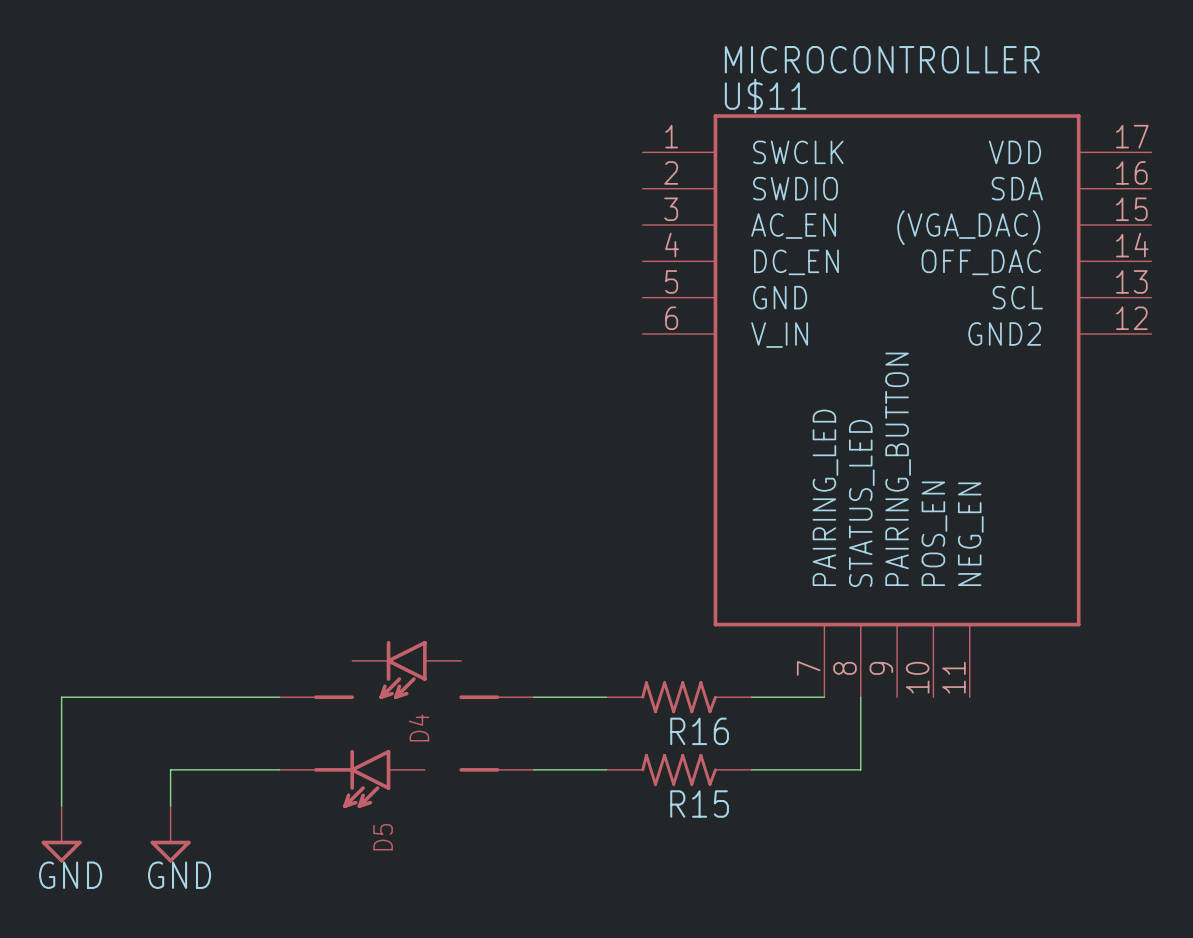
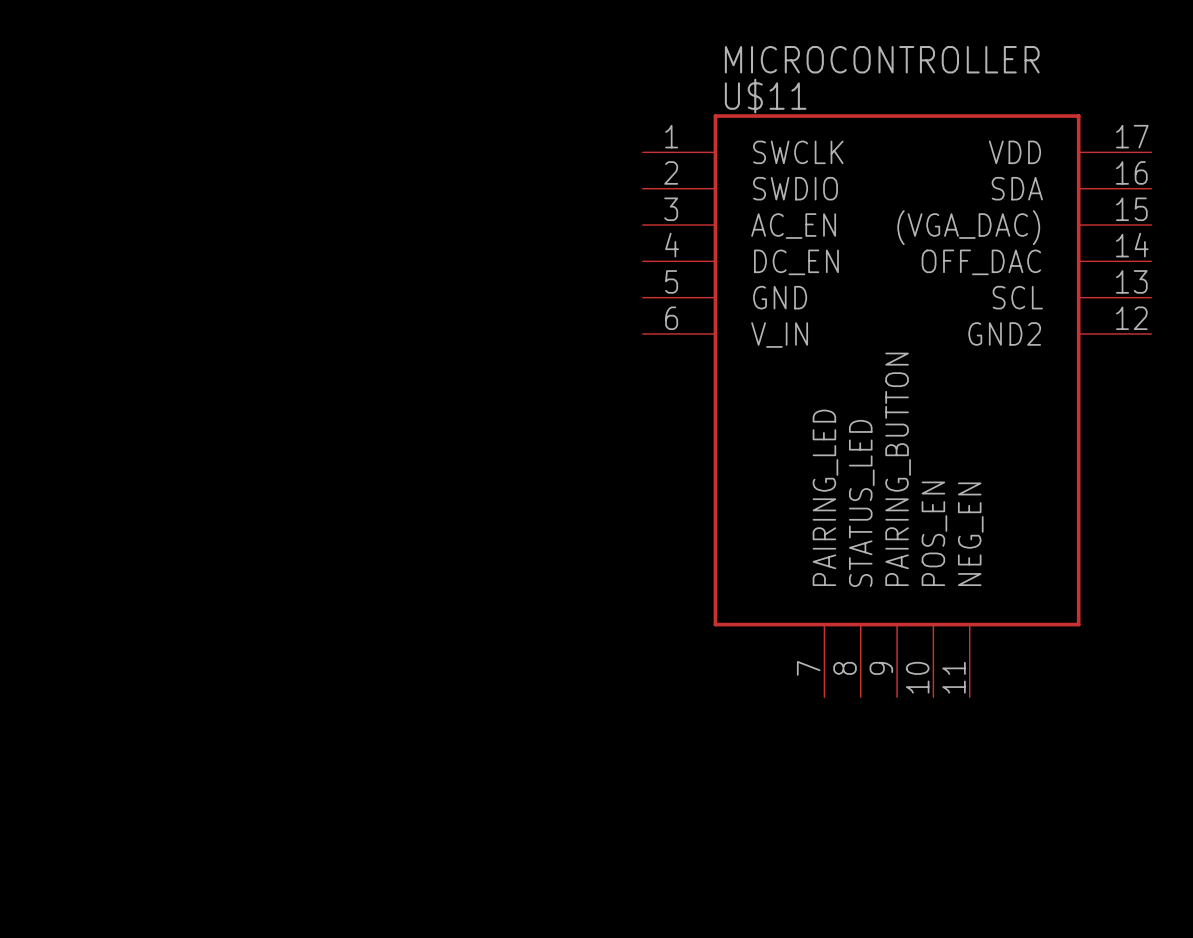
D4: (406, 669) -> none
wire: (279, 697) (61, 697) (61, 806) -> none
part: (316, 697) -> none
part: (496, 697) -> none
wire: (533, 697) (606, 697) -> none
R16: (679, 697) -> none
wire: (751, 697) (824, 697) -> none
wire: (860, 697) (860, 769) (751, 769) -> none
wire: (279, 769) (170, 769) (170, 806) -> none
part: (316, 769) -> none
part: (496, 769) -> none
wire: (533, 769) (606, 769) -> none
R15: (679, 769) -> none
D5: (370, 778) -> none
power symbol: GND (61, 834) -> none
power symbol: GND (170, 834) -> none

